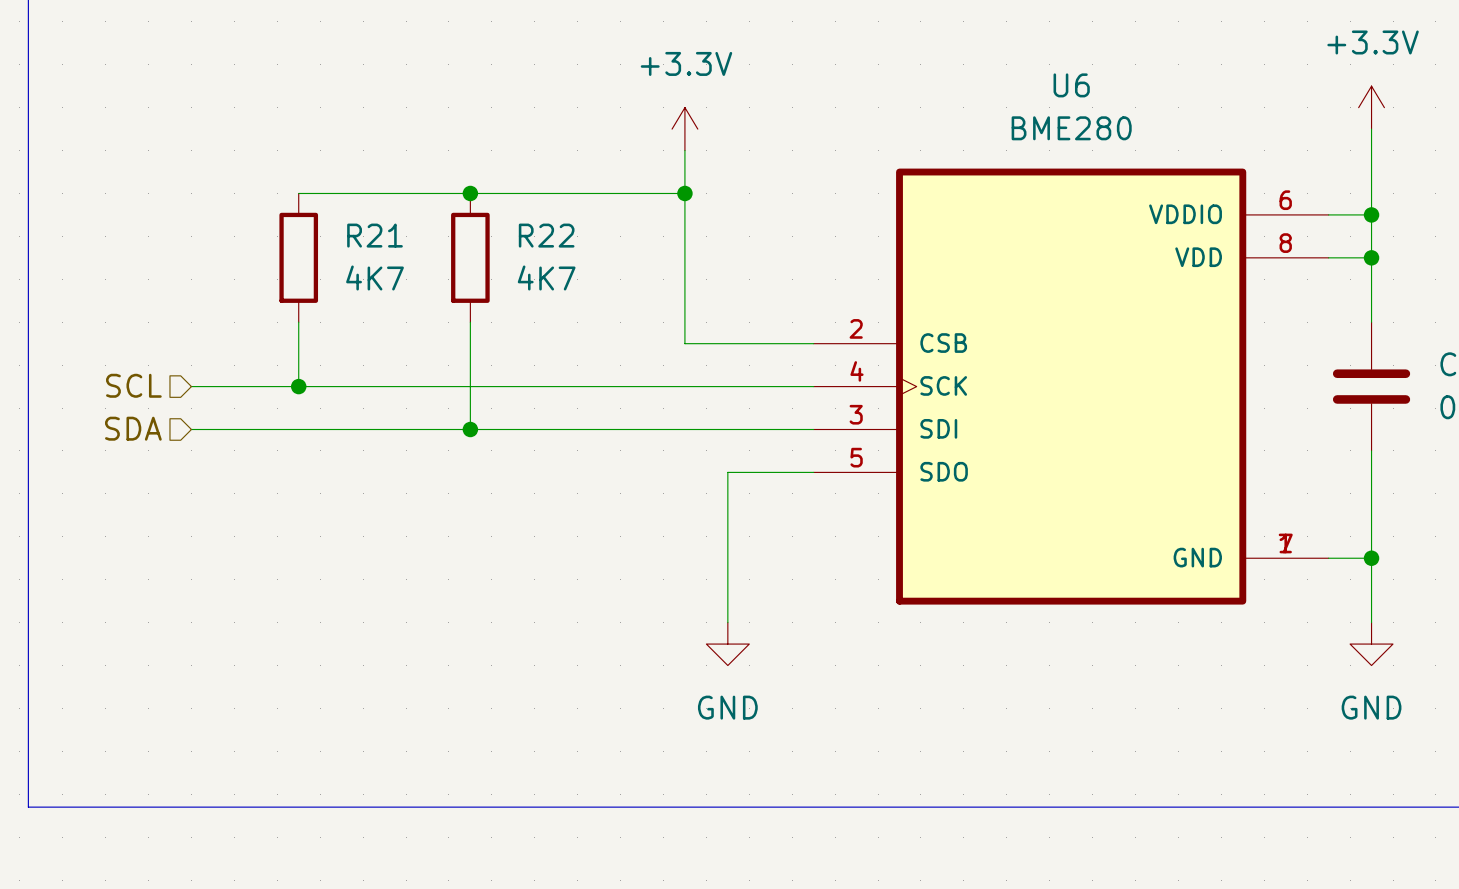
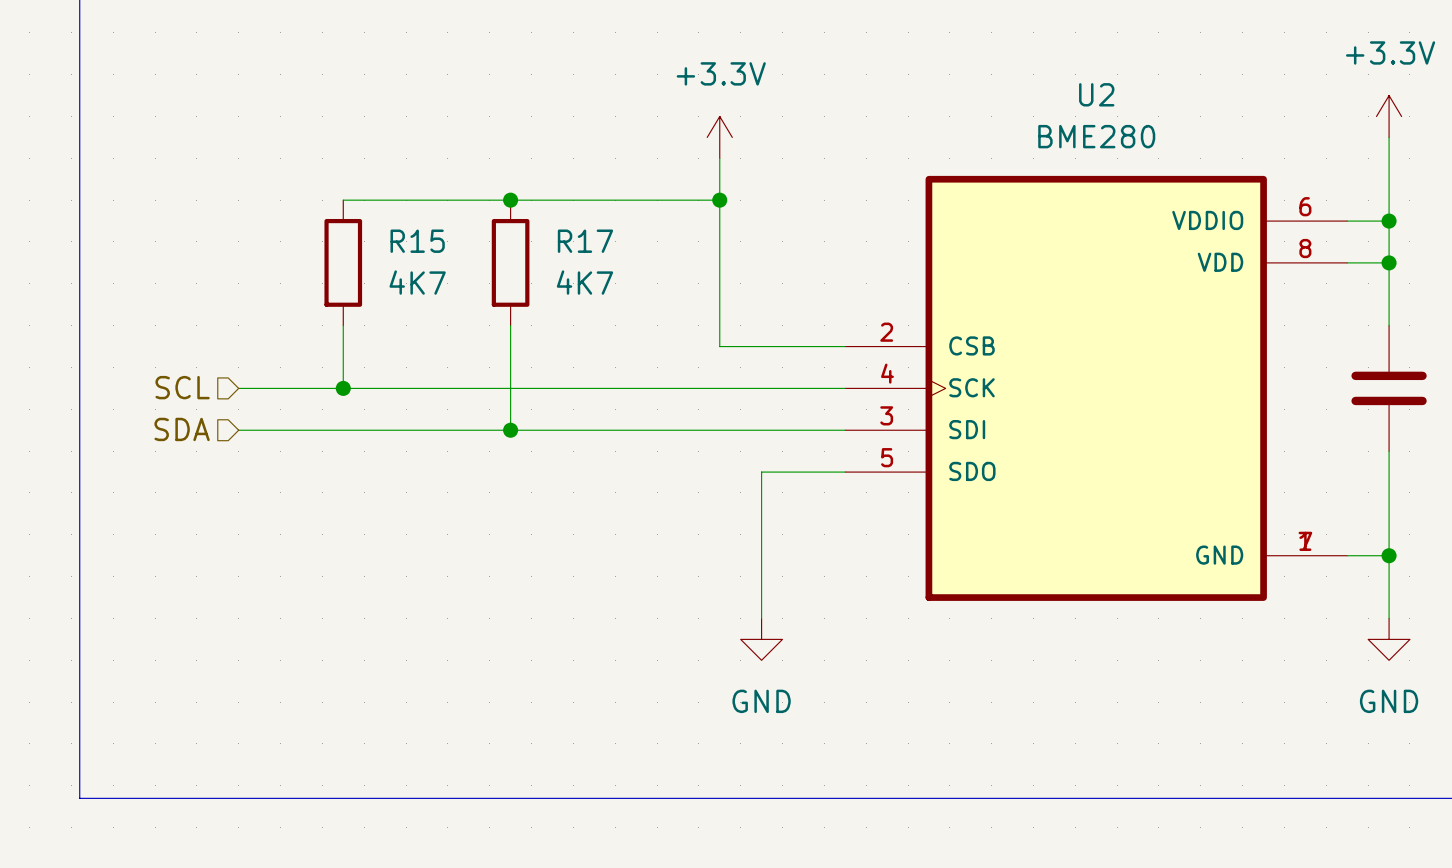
U6 name: U6 (1071, 85) -> U2 (1096, 94)
R21 name: R21 (375, 235) -> R15 (417, 241)
R22 name: R22 (546, 235) -> R17 (585, 241)

